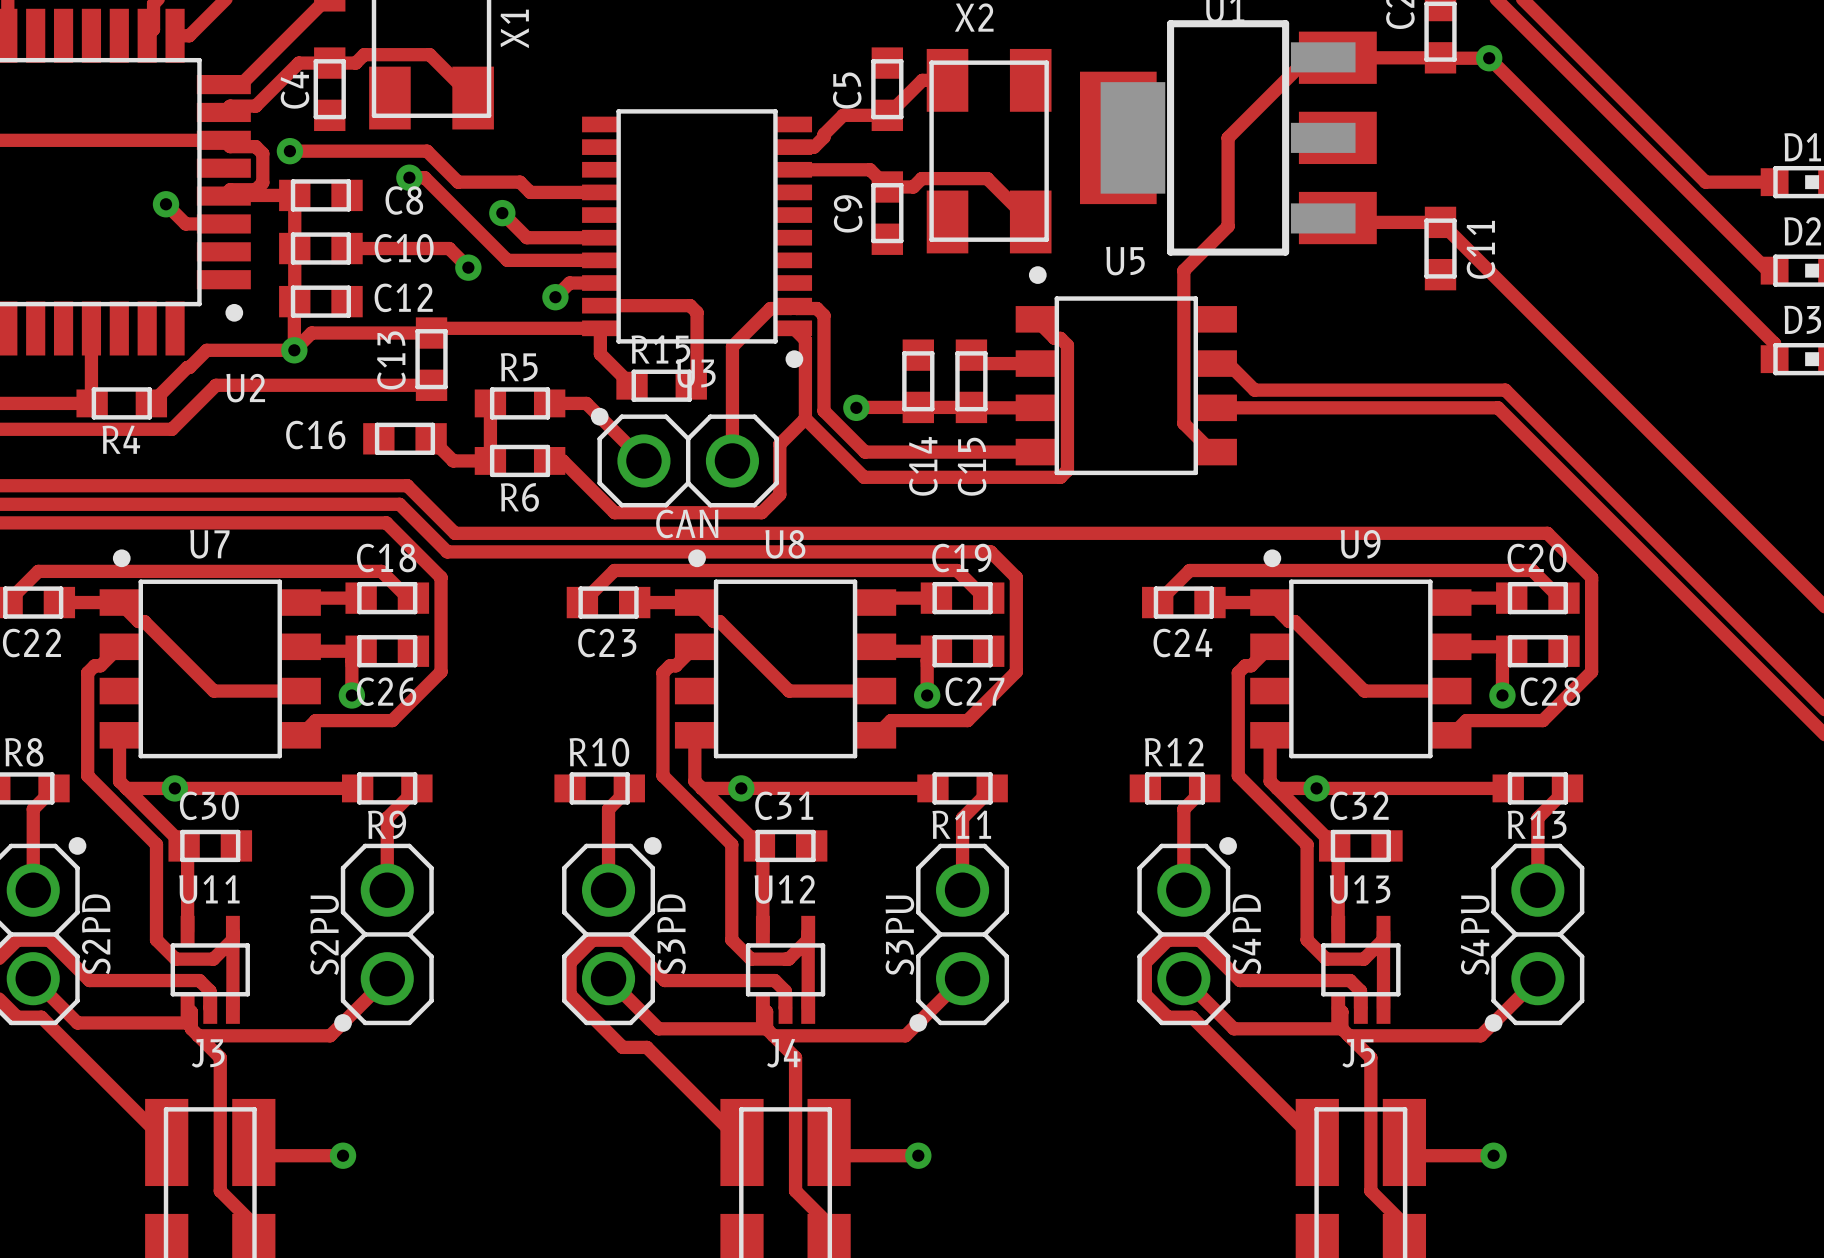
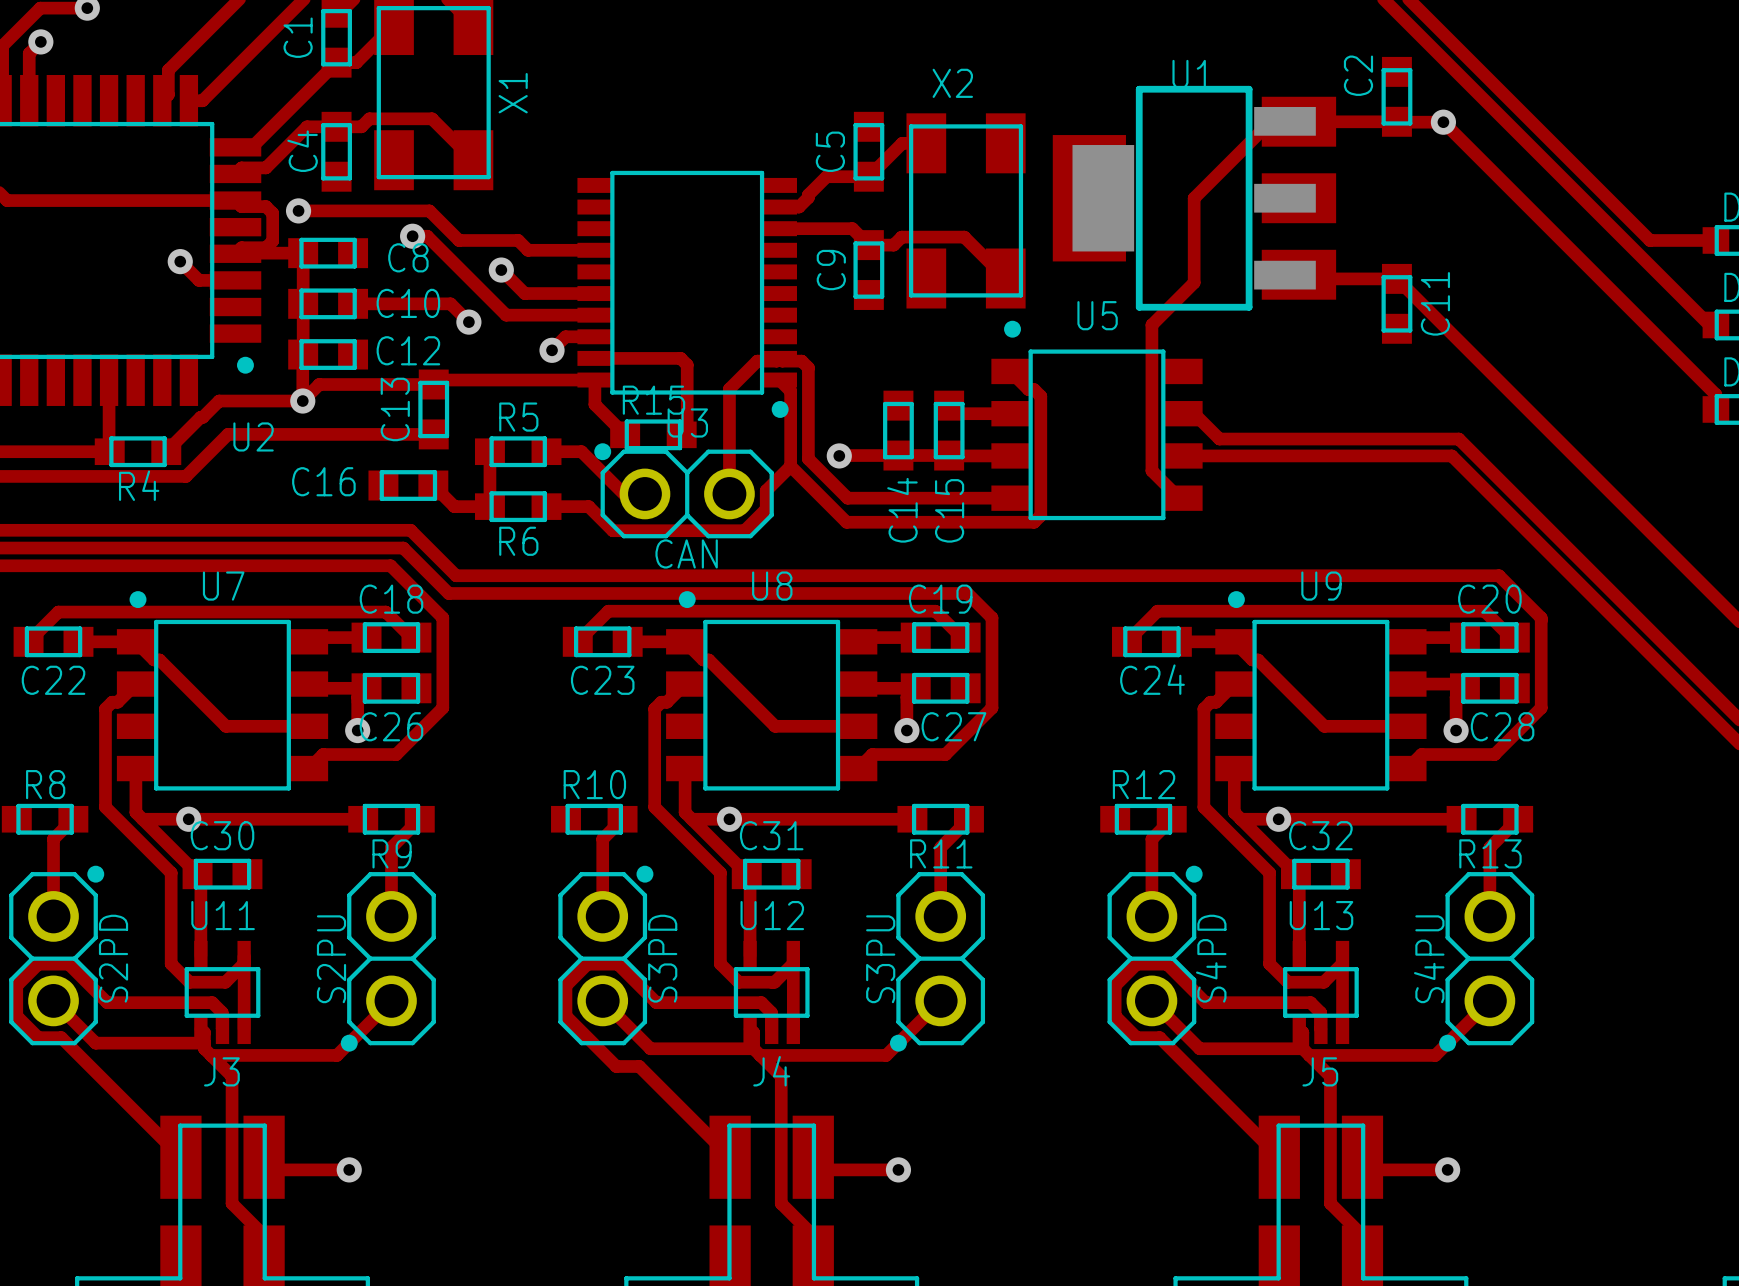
track: (741, 337) (732, 346) (732, 460) -> (729, 389) (729, 493)
CAN position: (684, 457) -> (684, 490)
track: (562, 460) (614, 512) (761, 512) (779, 494) (779, 463) -> (559, 506) (588, 506) (612, 530) (744, 530) (766, 509)

